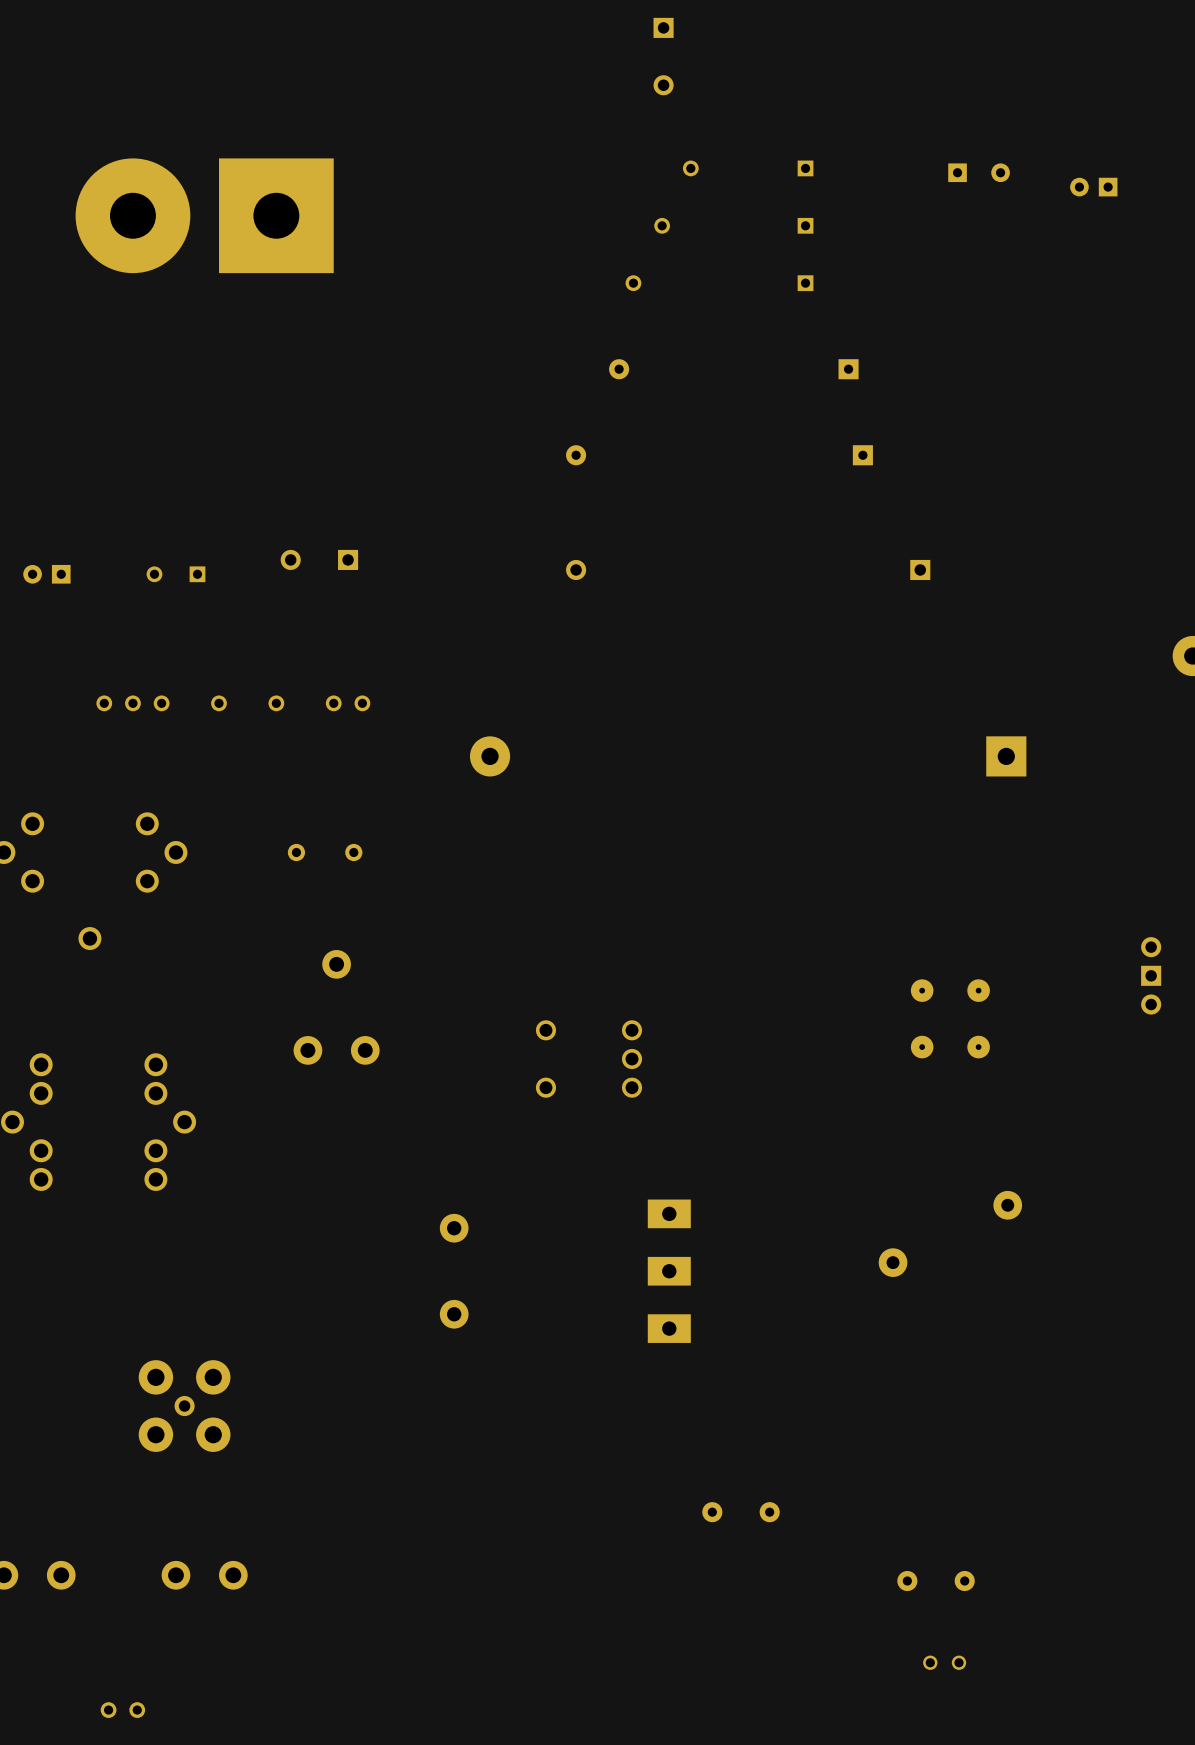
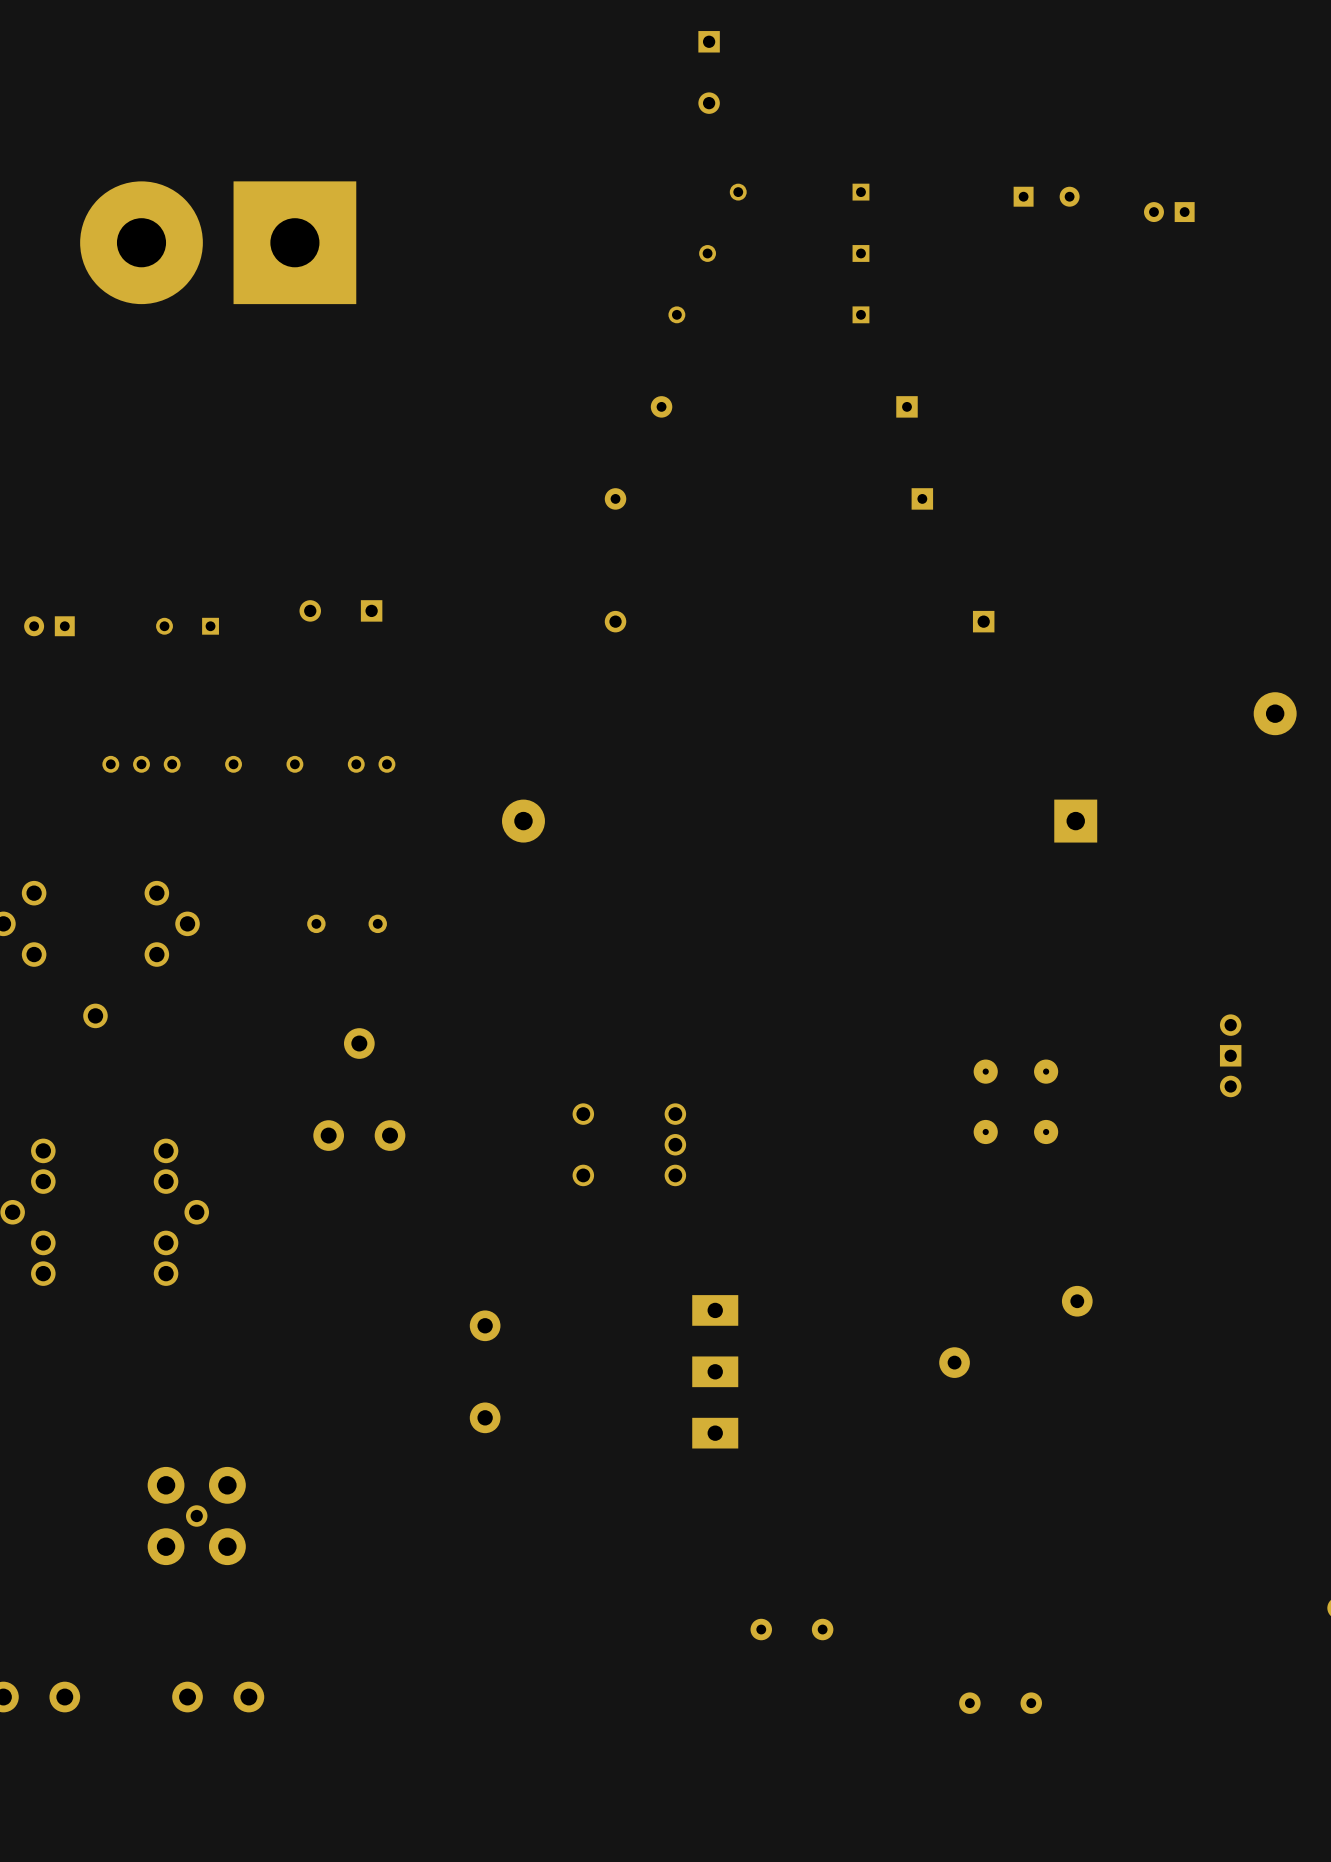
part: (944, 1662) -> none
part: (122, 1710) -> none

